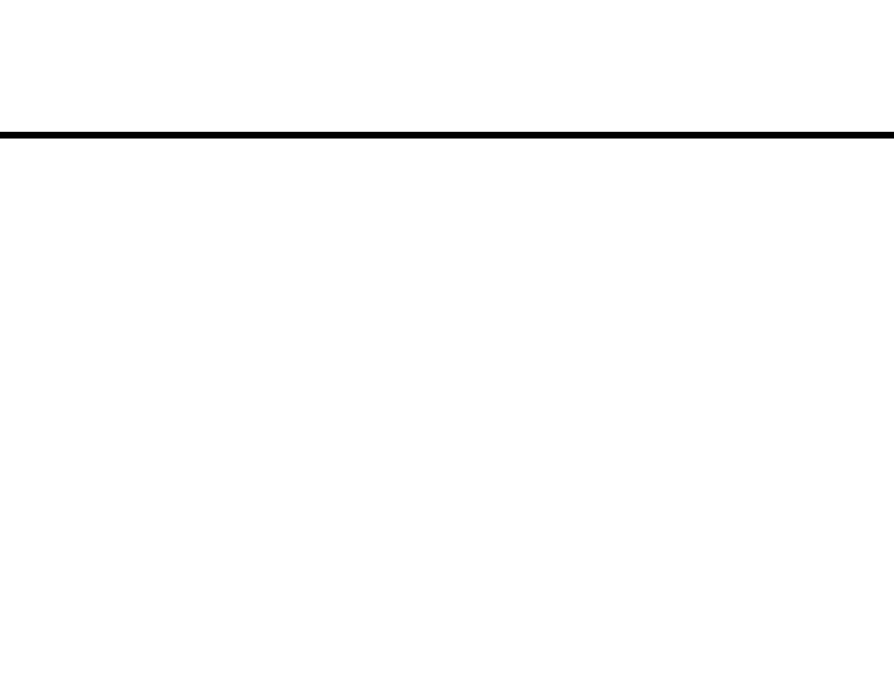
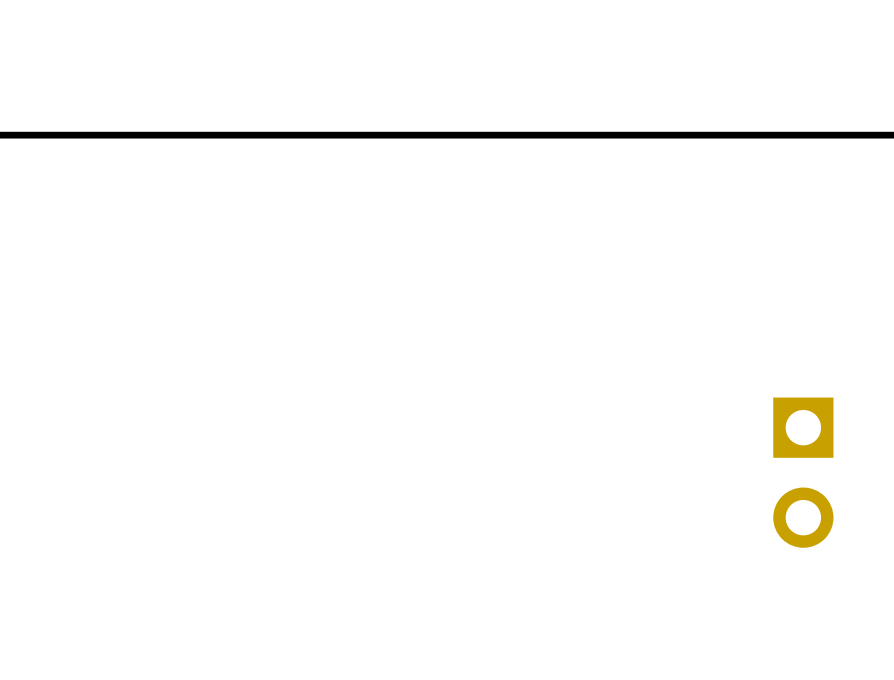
part: none -> (803, 472)

